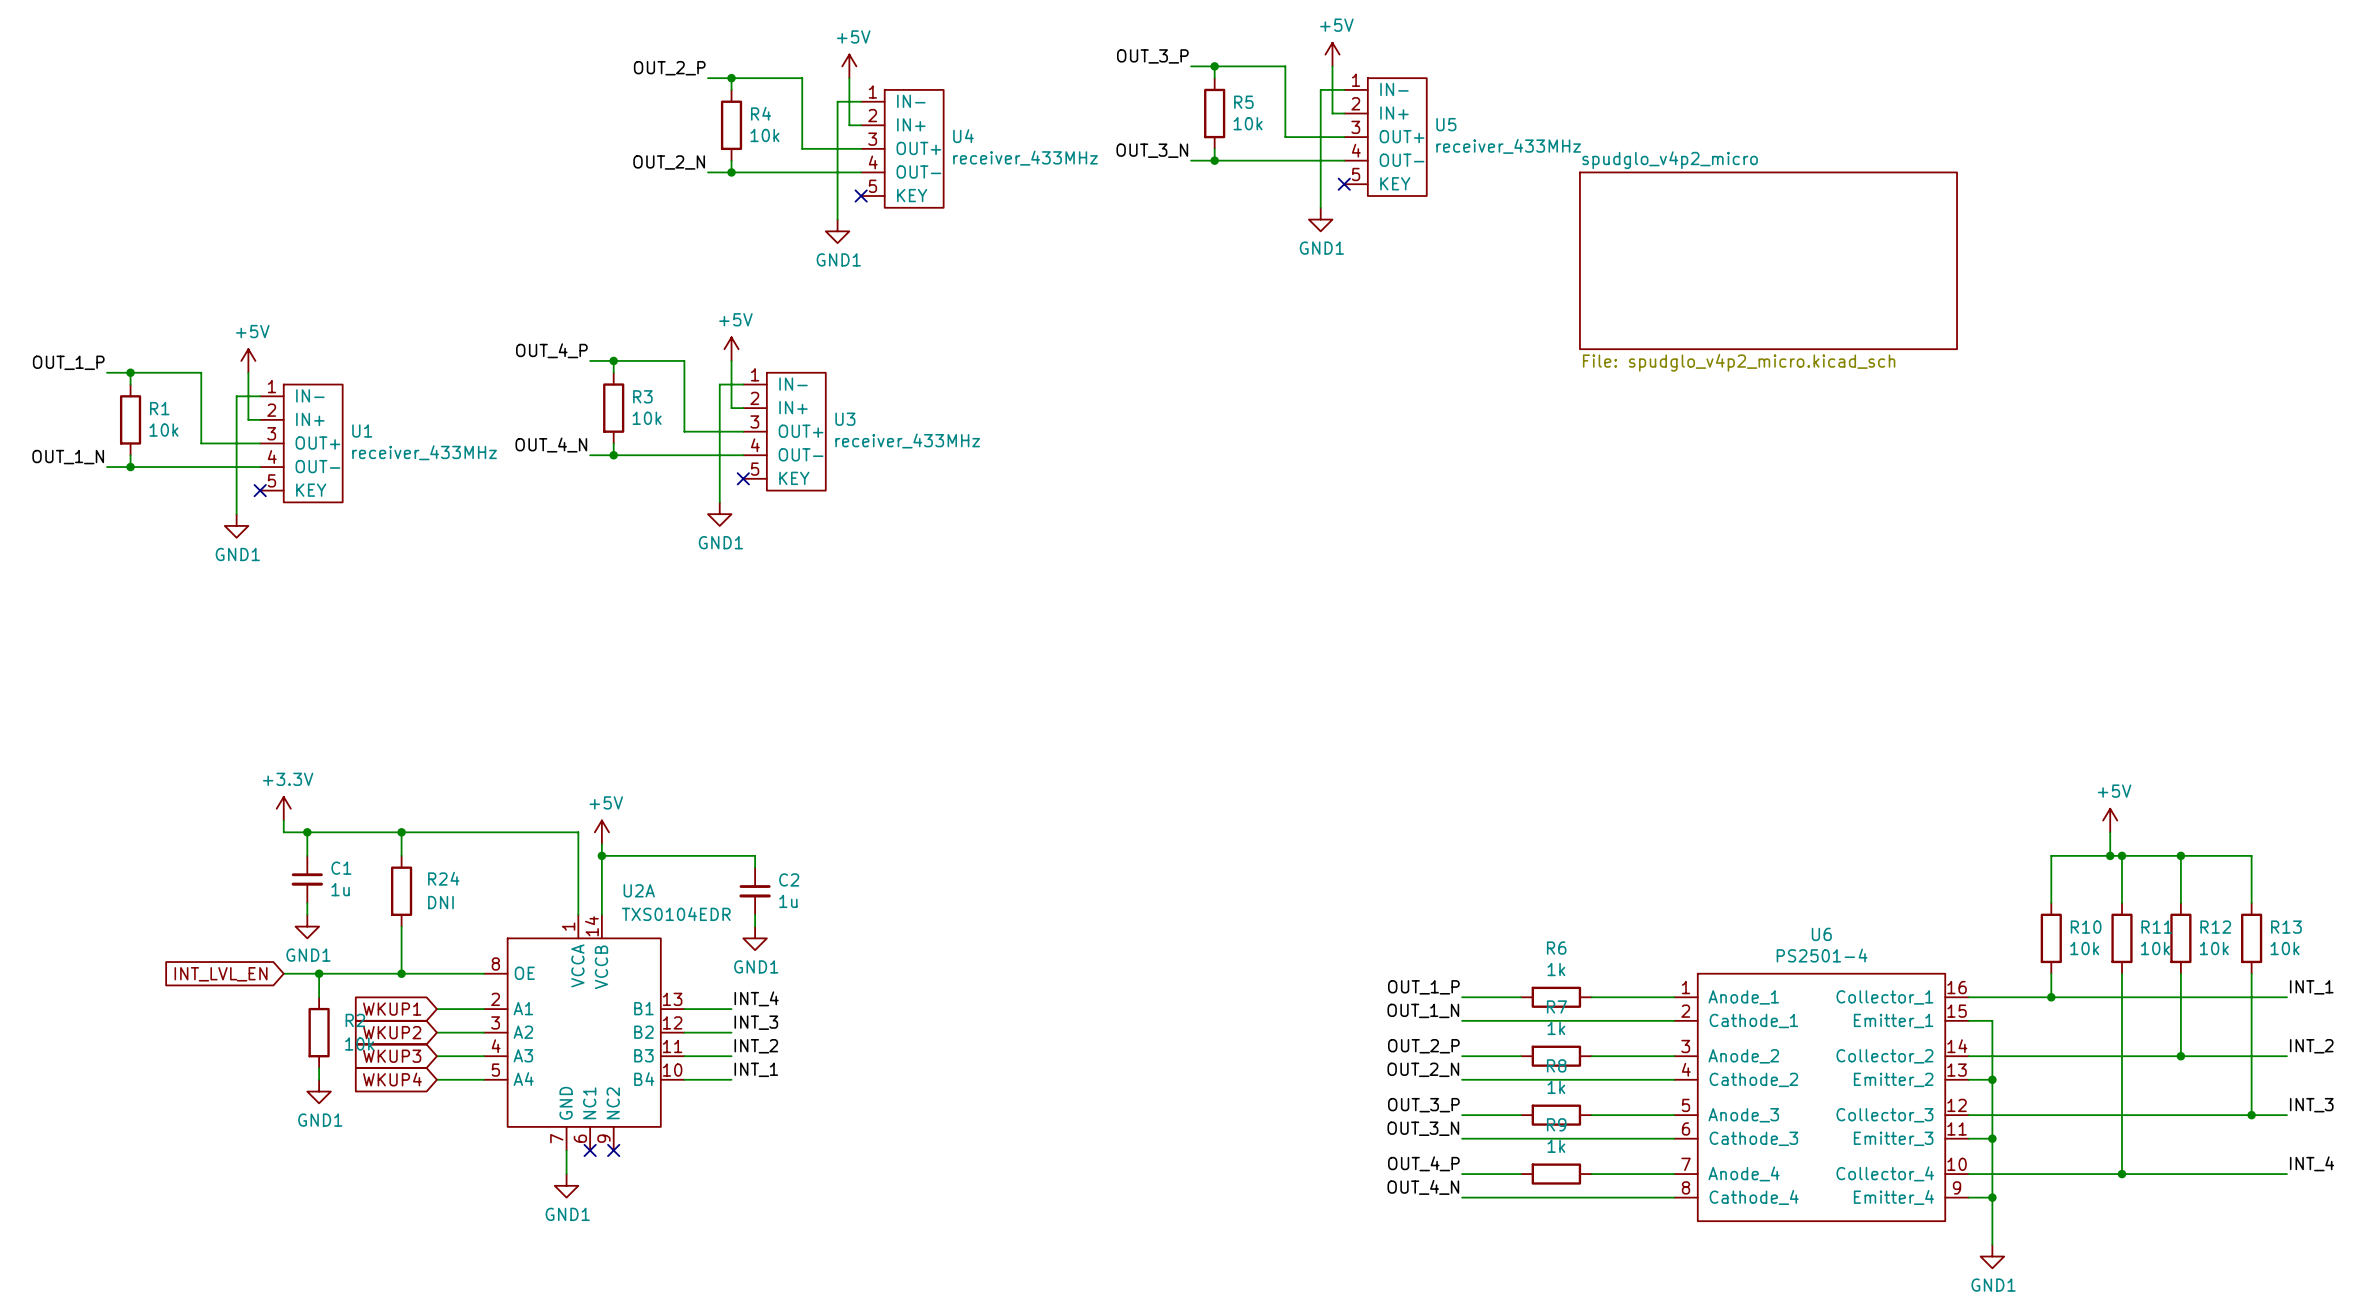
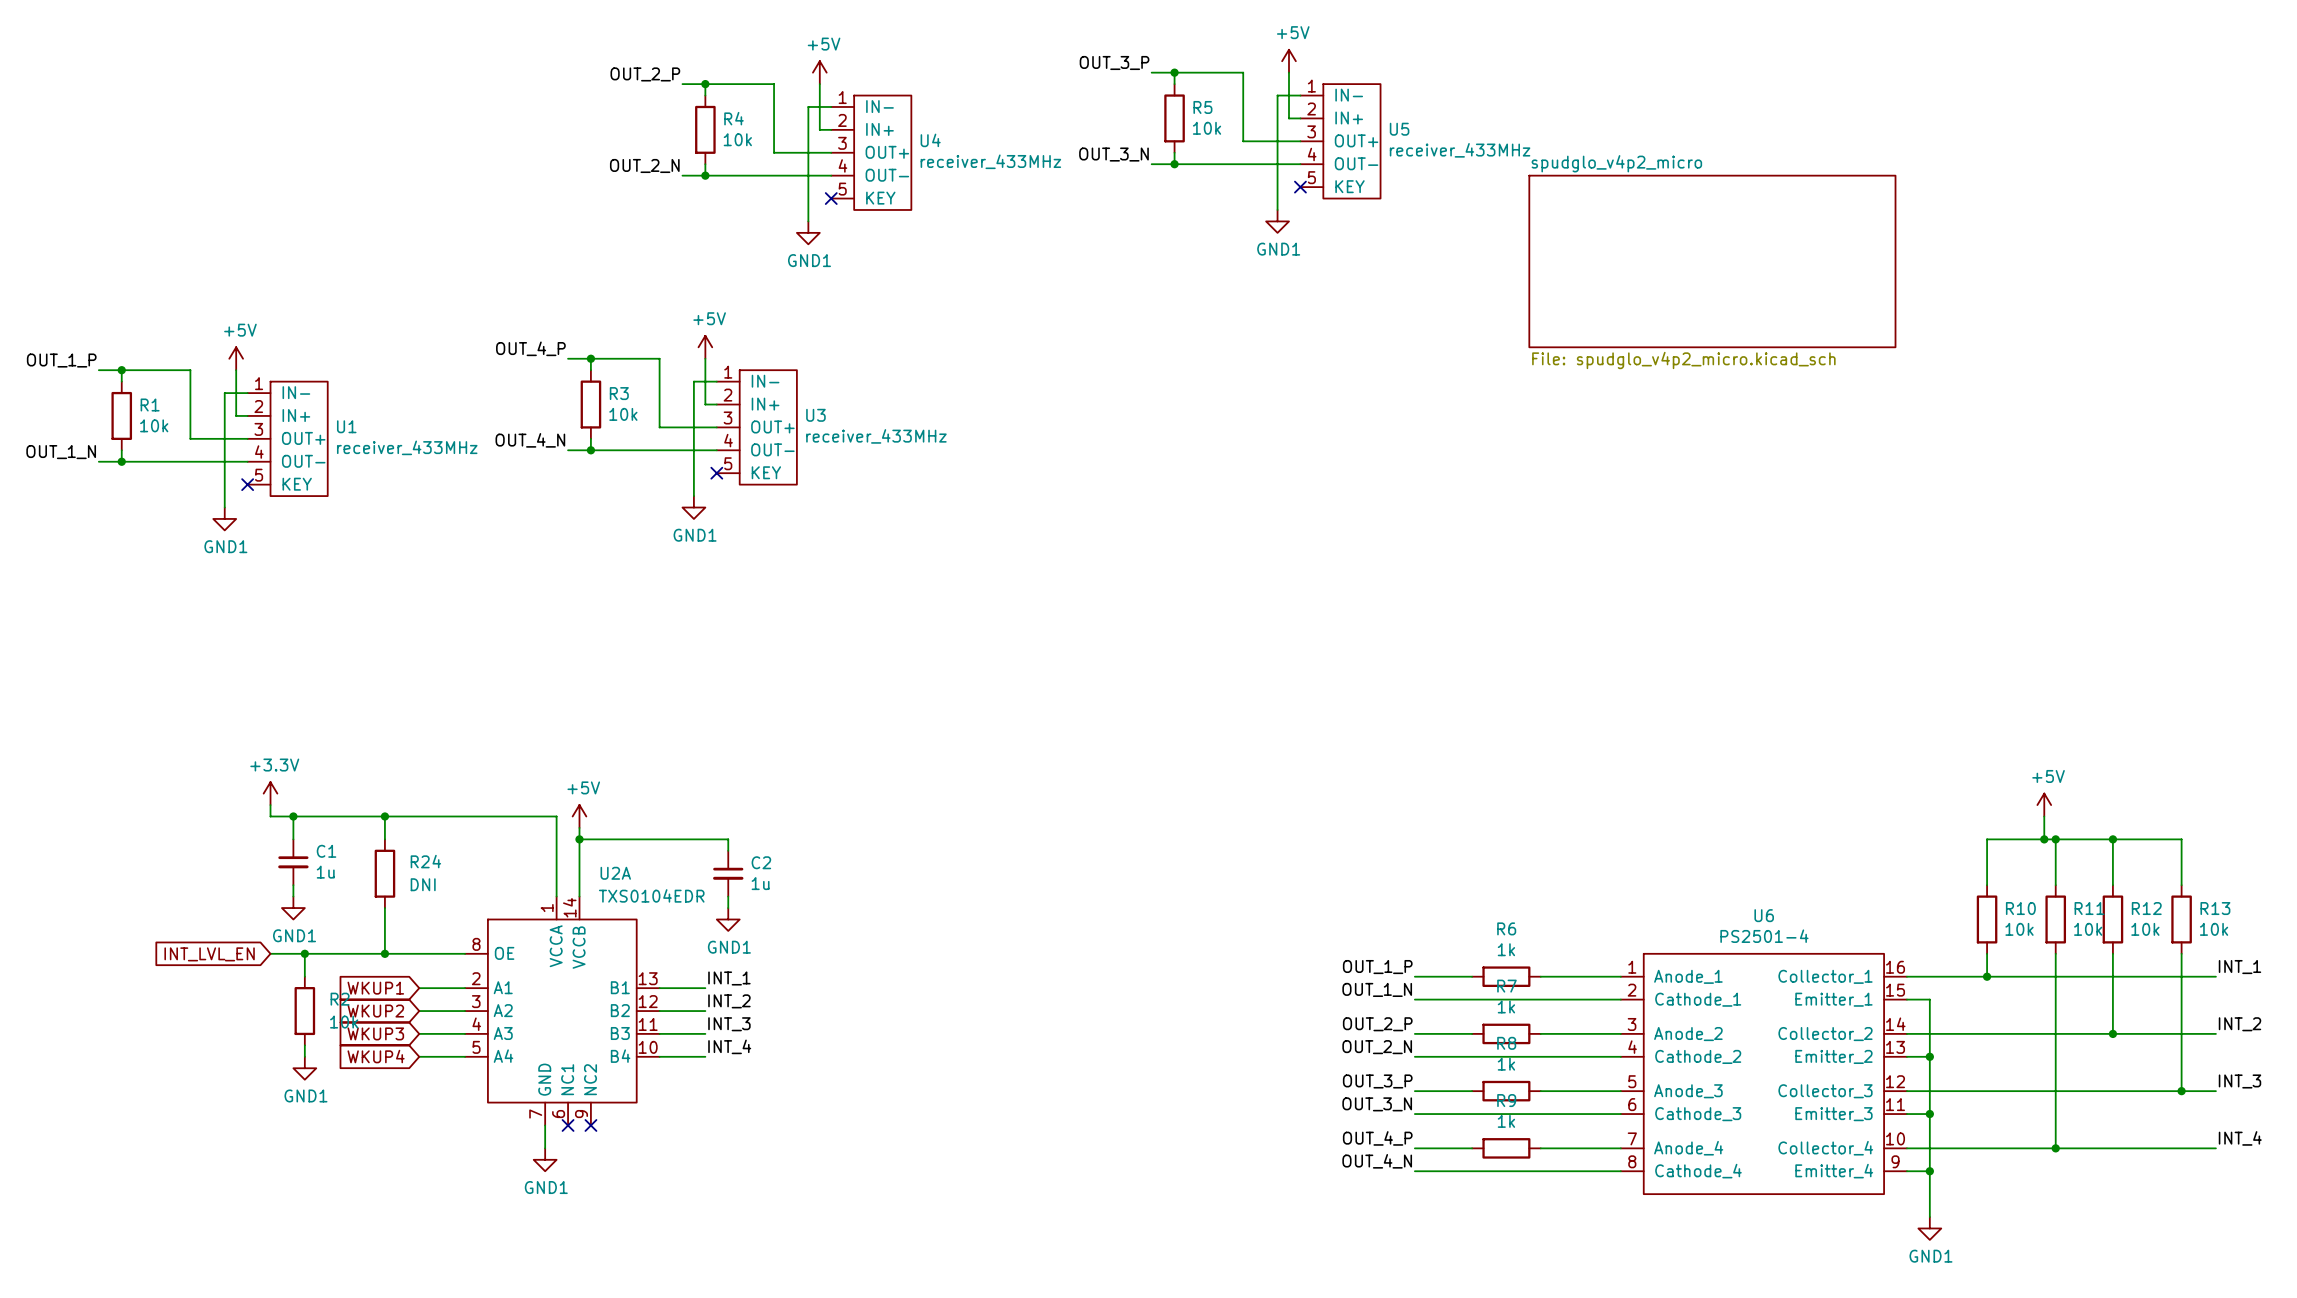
label: INT_4 (756, 998) -> INT_1 (729, 978)
label: INT_3 (756, 1022) -> INT_2 (729, 1001)
label: INT_2 (756, 1046) -> INT_3 (729, 1024)
label: INT_1 (756, 1069) -> INT_4 (729, 1046)

